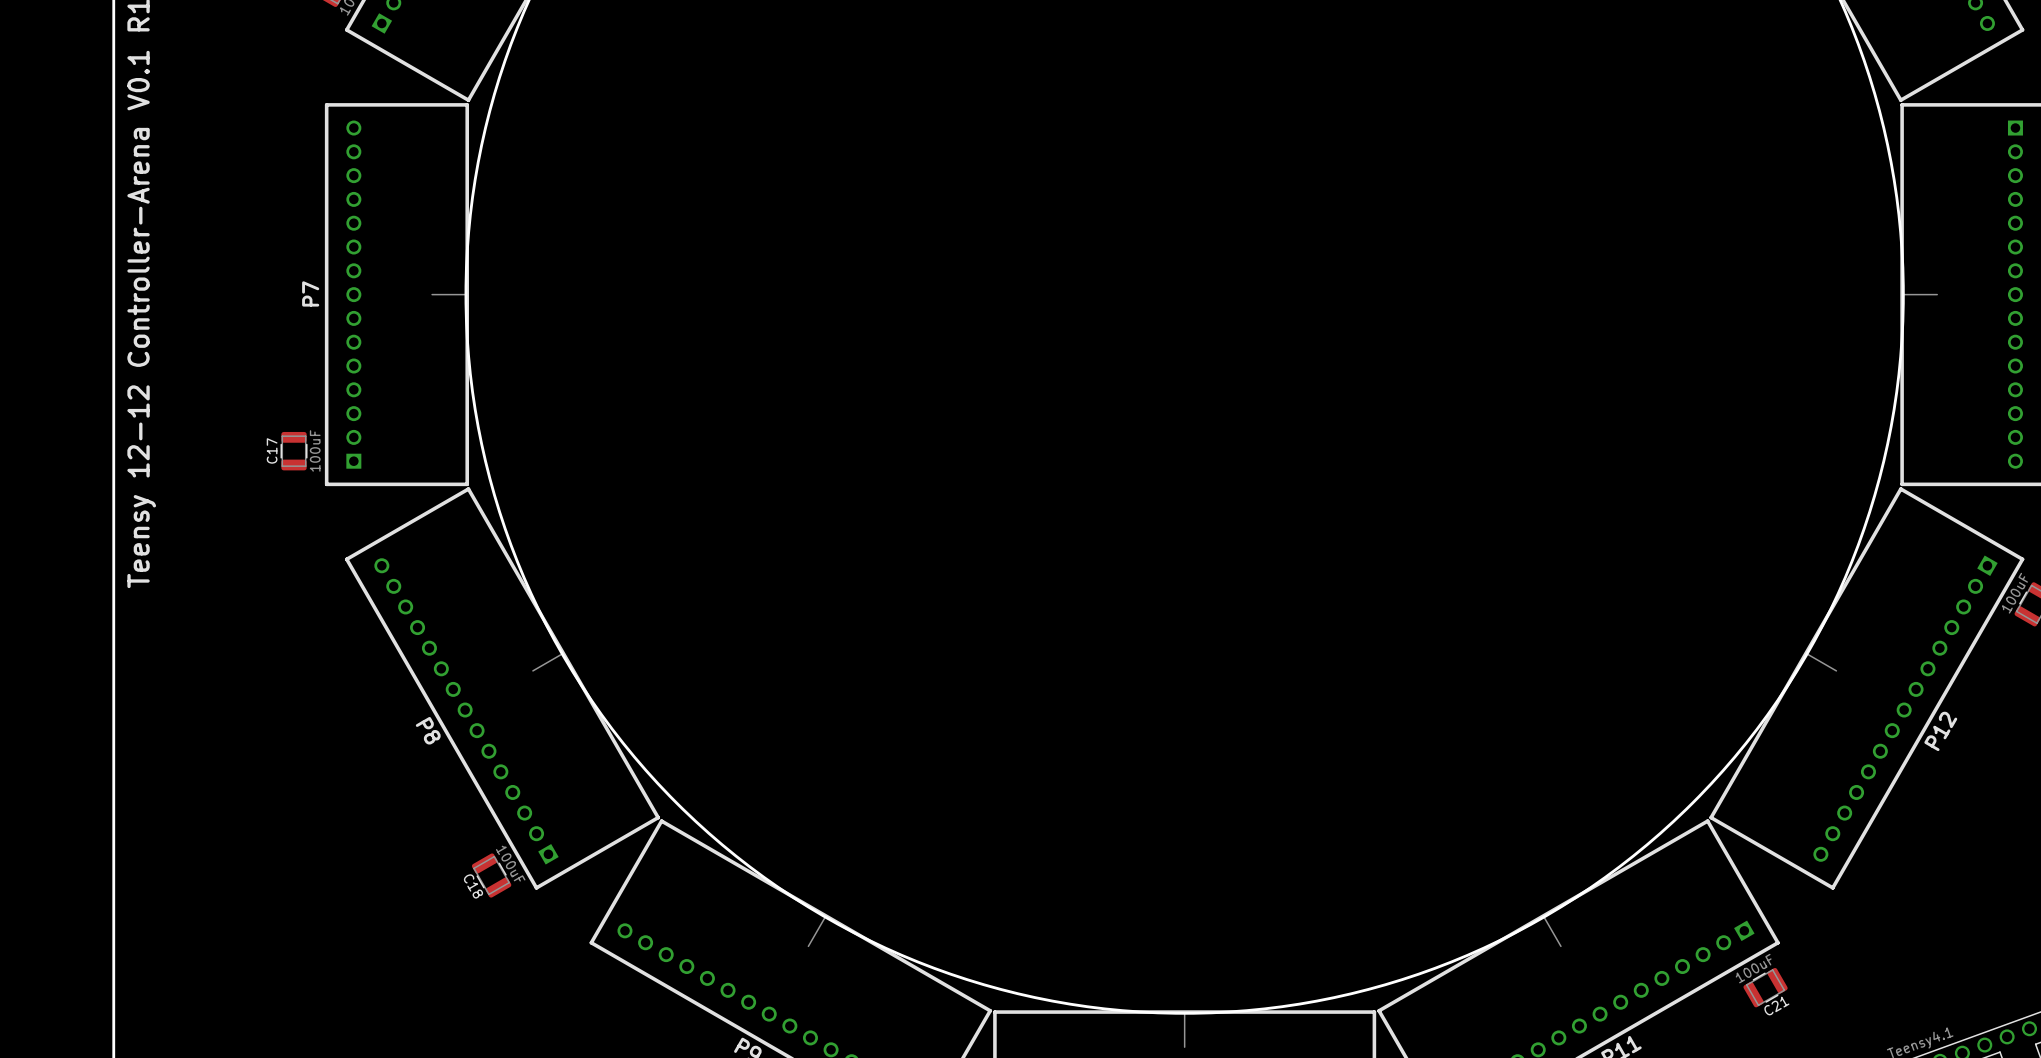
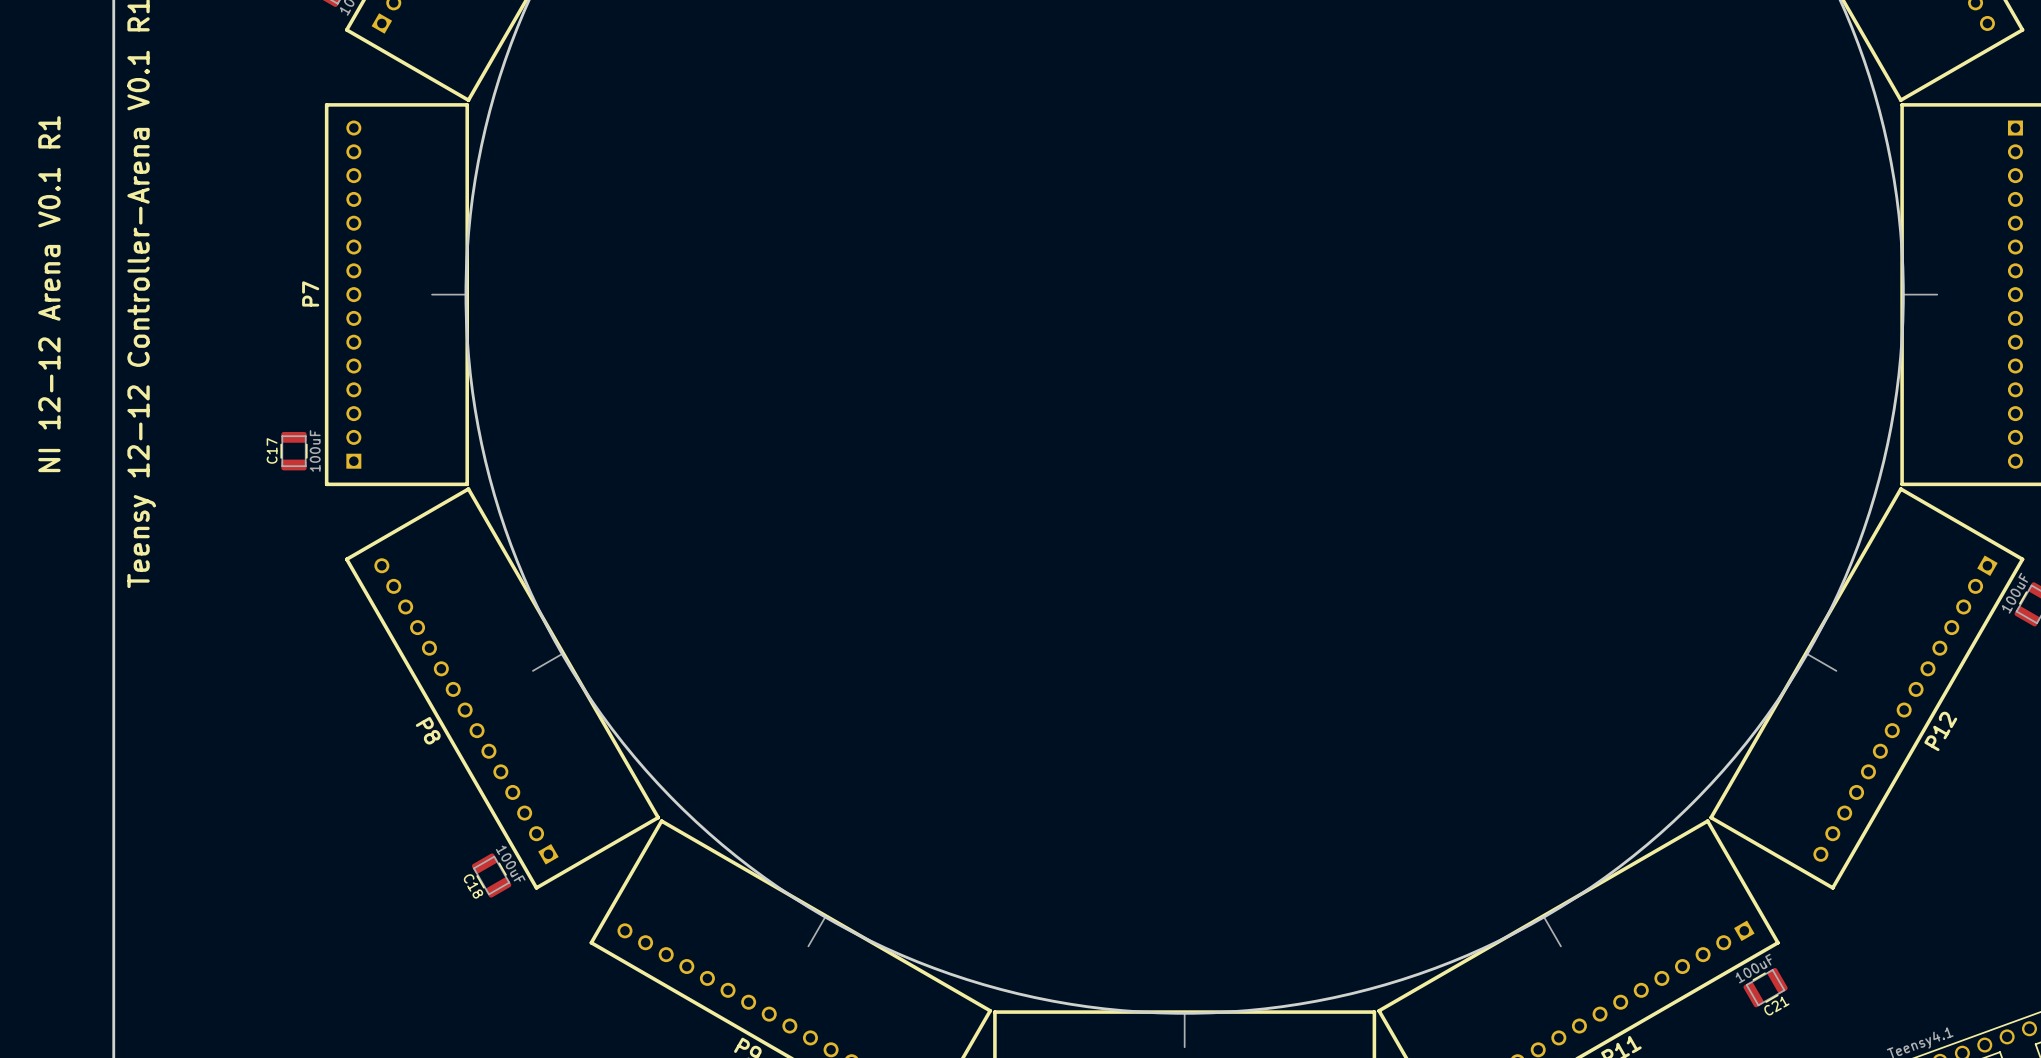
text: none -> NI 12-12 Arena V0.1 R1 (49, 294)

